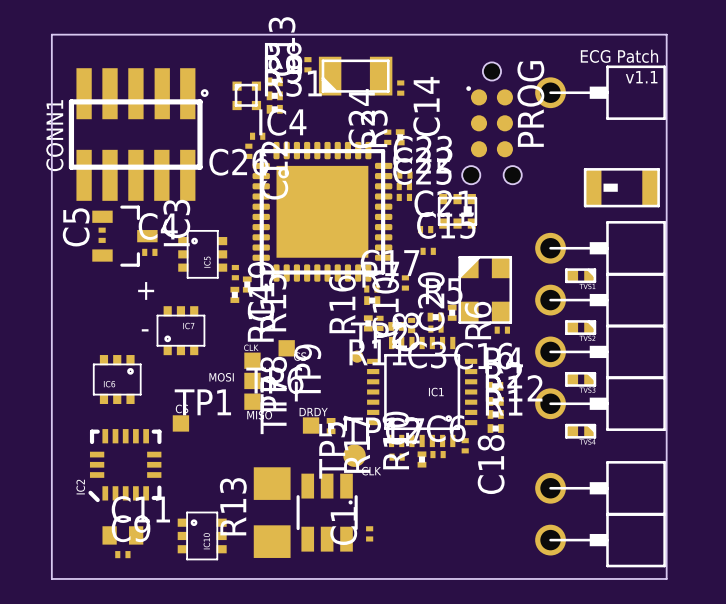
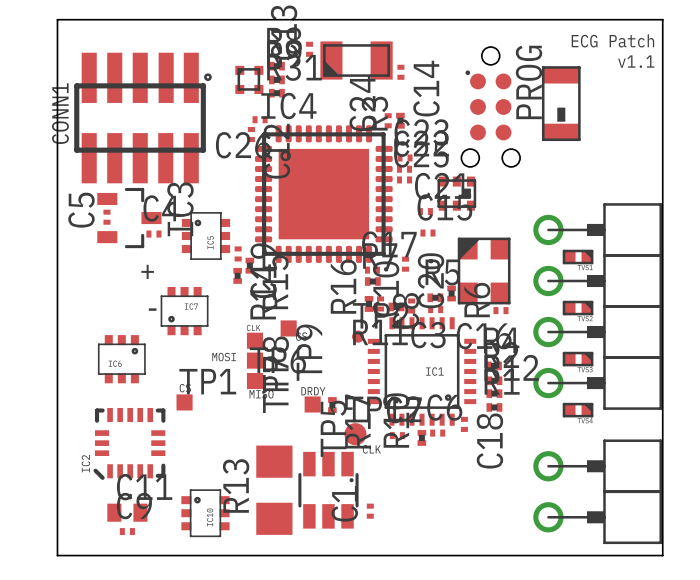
part: (600, 92) -> none
part rotation: 0° (621, 187) -> 90° counterclockwise (561, 103)
part position: (621, 187) -> (561, 103)

